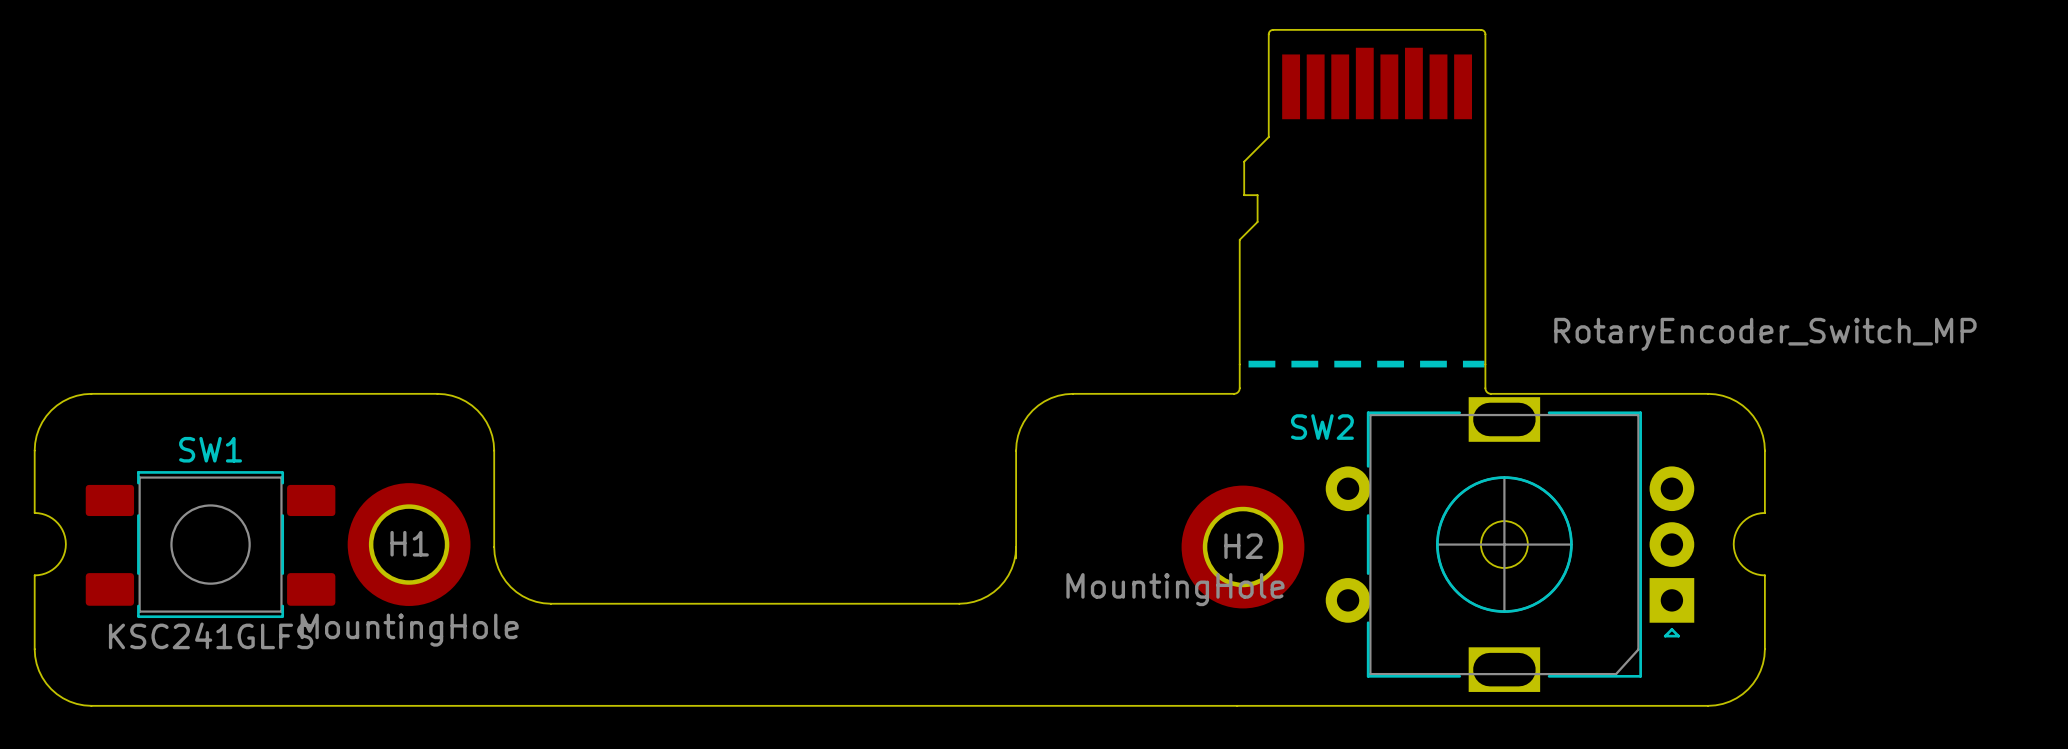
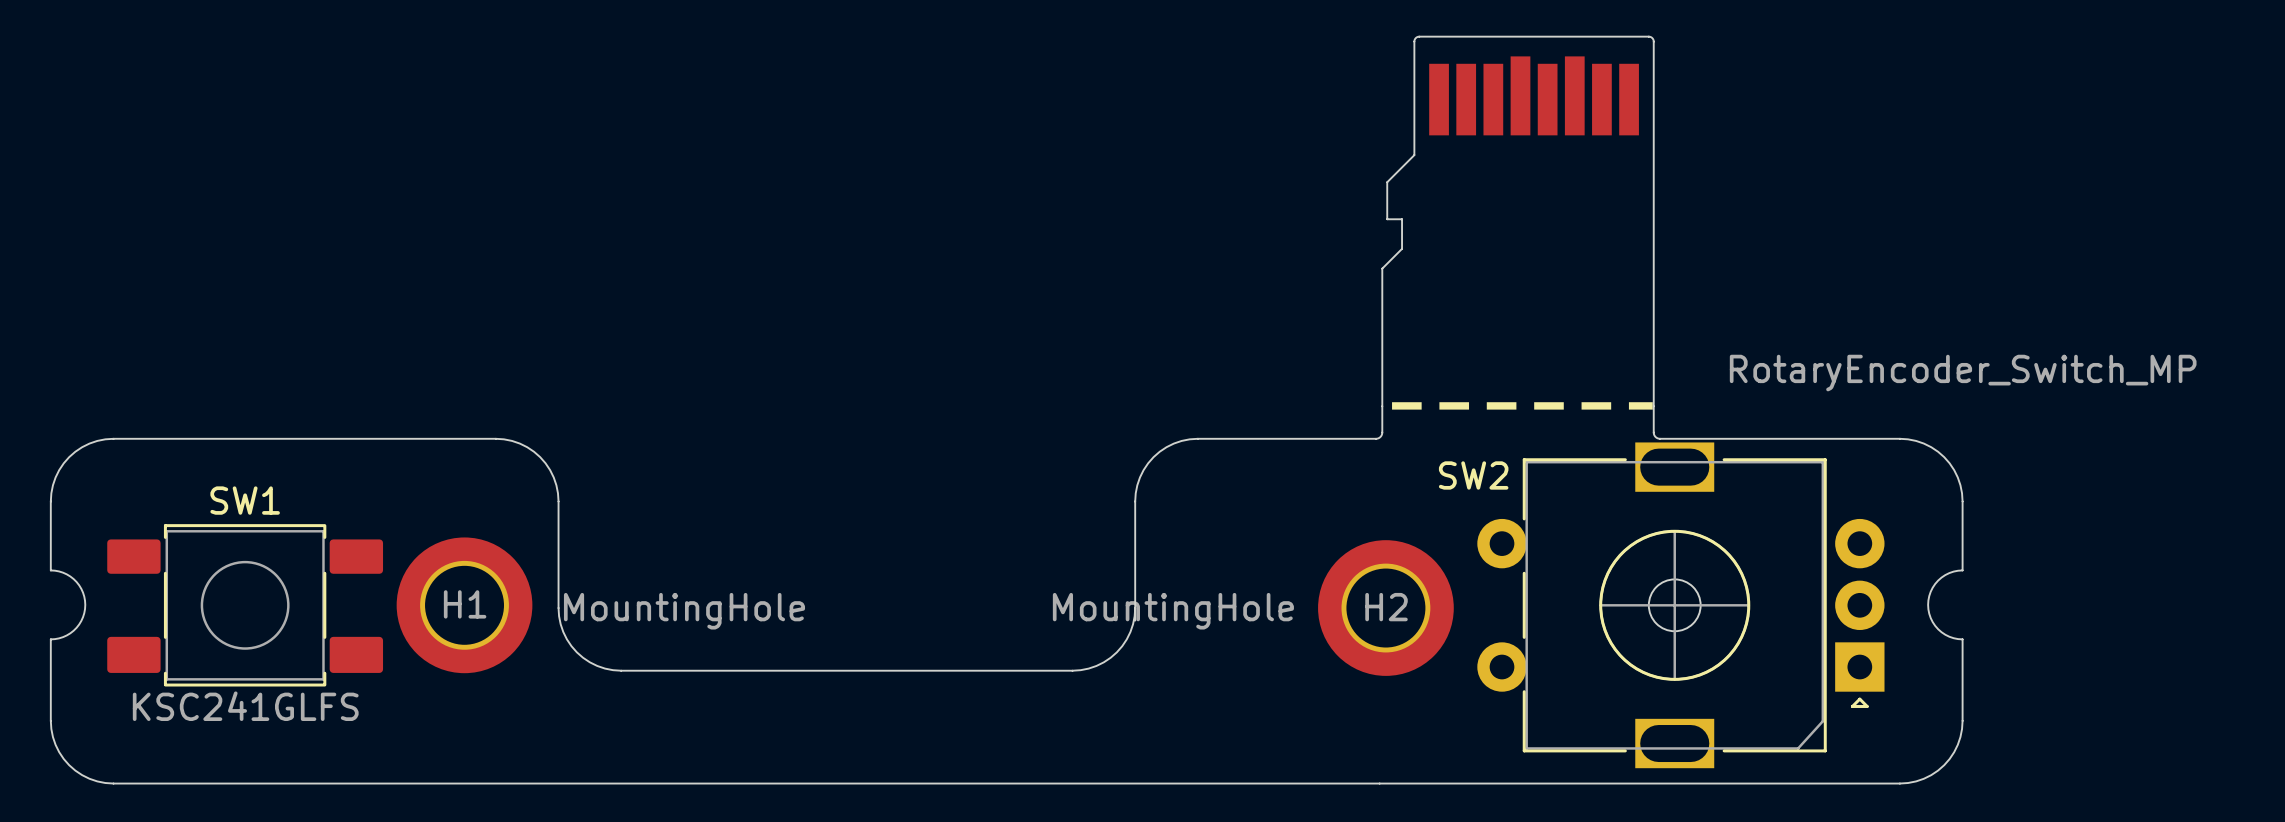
H2 value position: MountingHole (1175, 589) -> MountingHole (1173, 611)
H1 value position: MountingHole (409, 630) -> MountingHole (684, 611)

